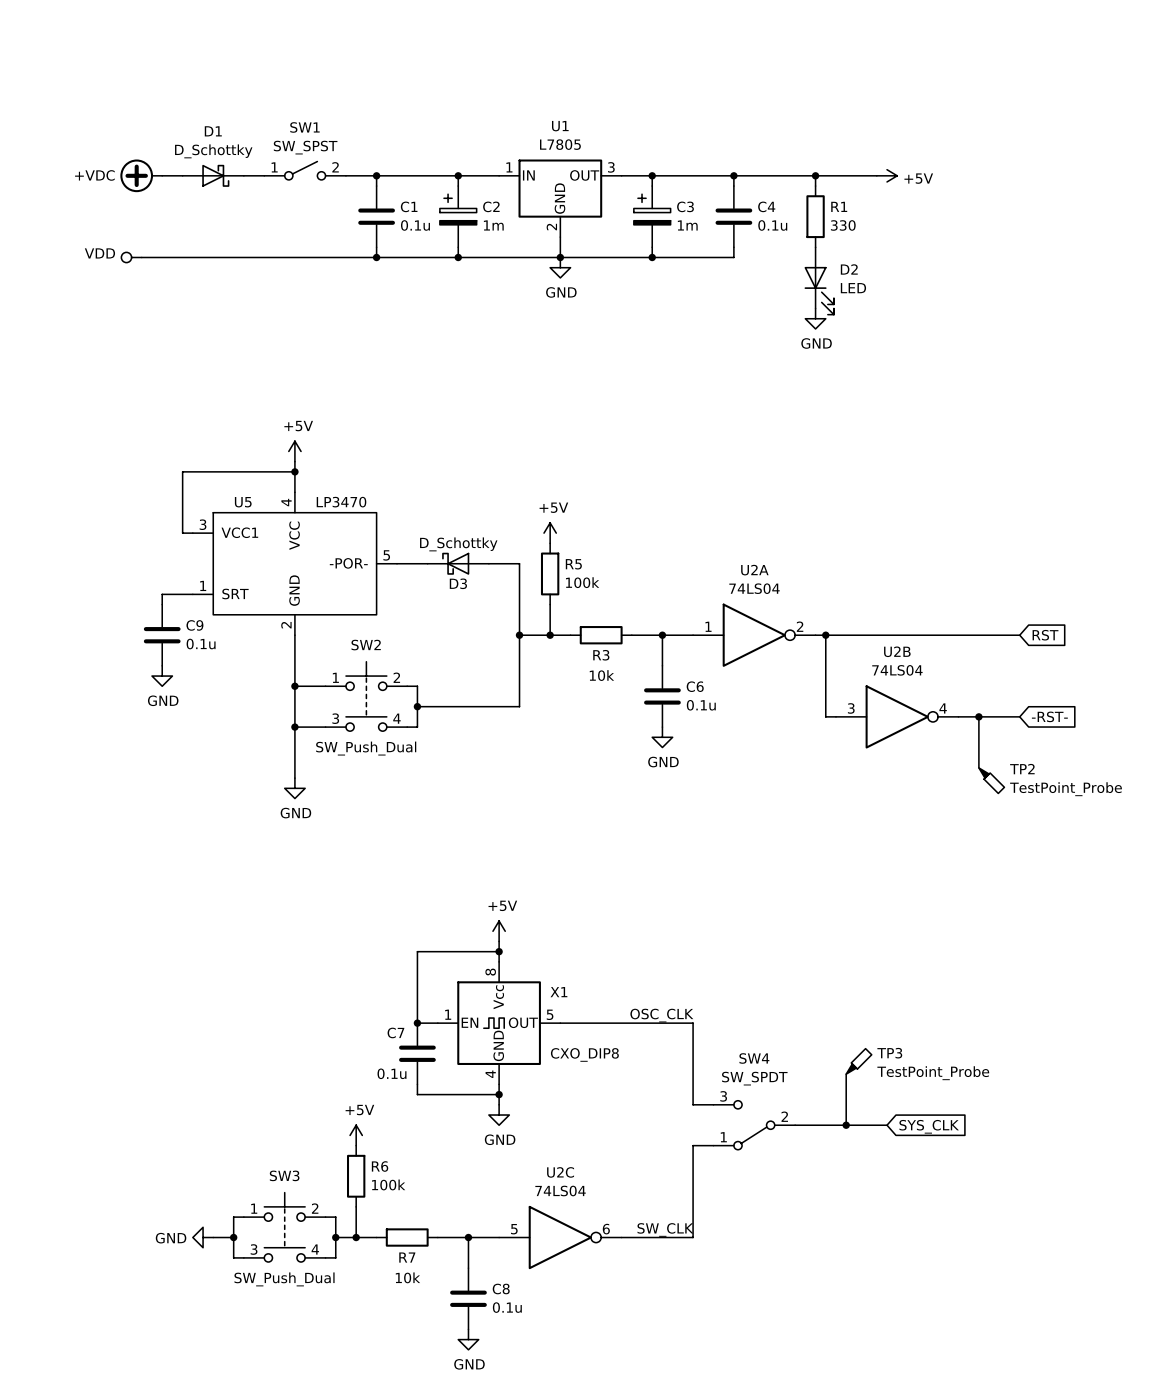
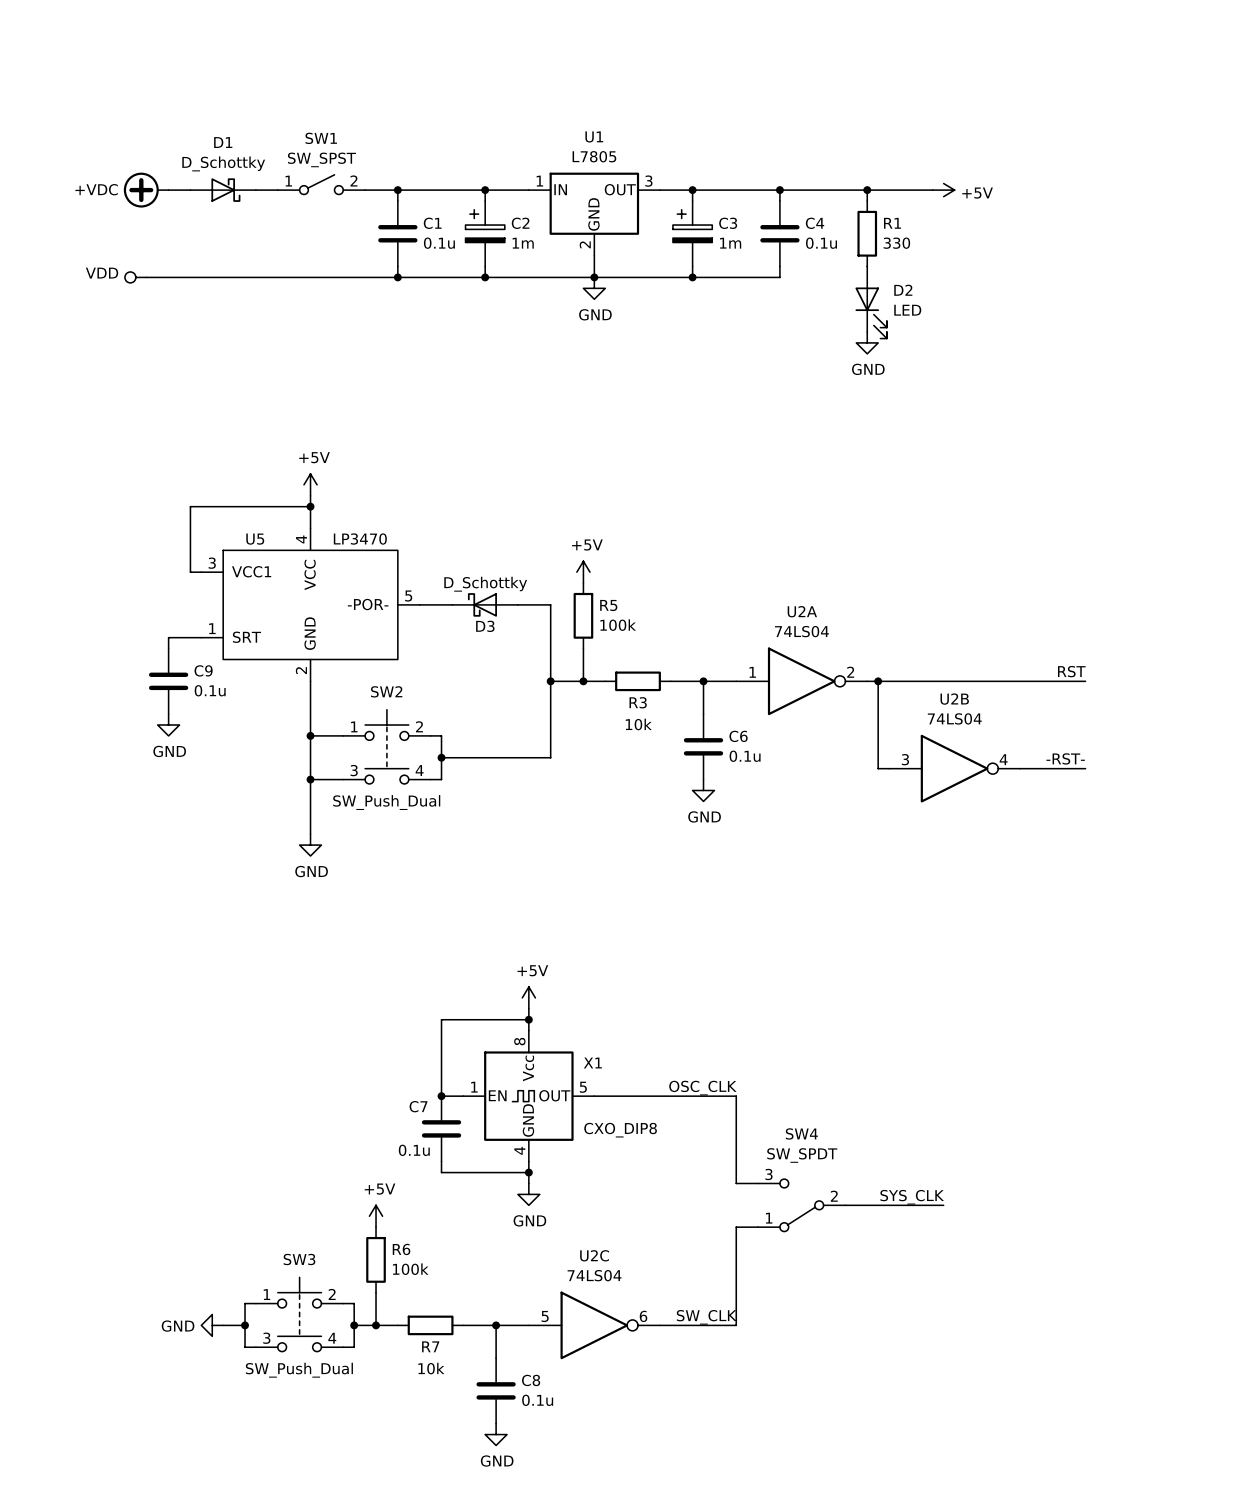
label: none -> RST (1071, 671)
global label: RST (1045, 635) -> none
label: none -> -RST- (1065, 758)
wire: (978, 716) (978, 767) -> none
junction: (978, 716) -> none
global label: -RST- (1049, 716) -> none
TP2: TestPoint_Probe (991, 780) -> none
TP3: TestPoint_Probe (858, 1061) -> none
wire: (846, 1074) (846, 1125) -> none
label: none -> SYS_CLK (912, 1197)
junction: (846, 1125) -> none
global label: SYS_CLK (929, 1126) -> none

